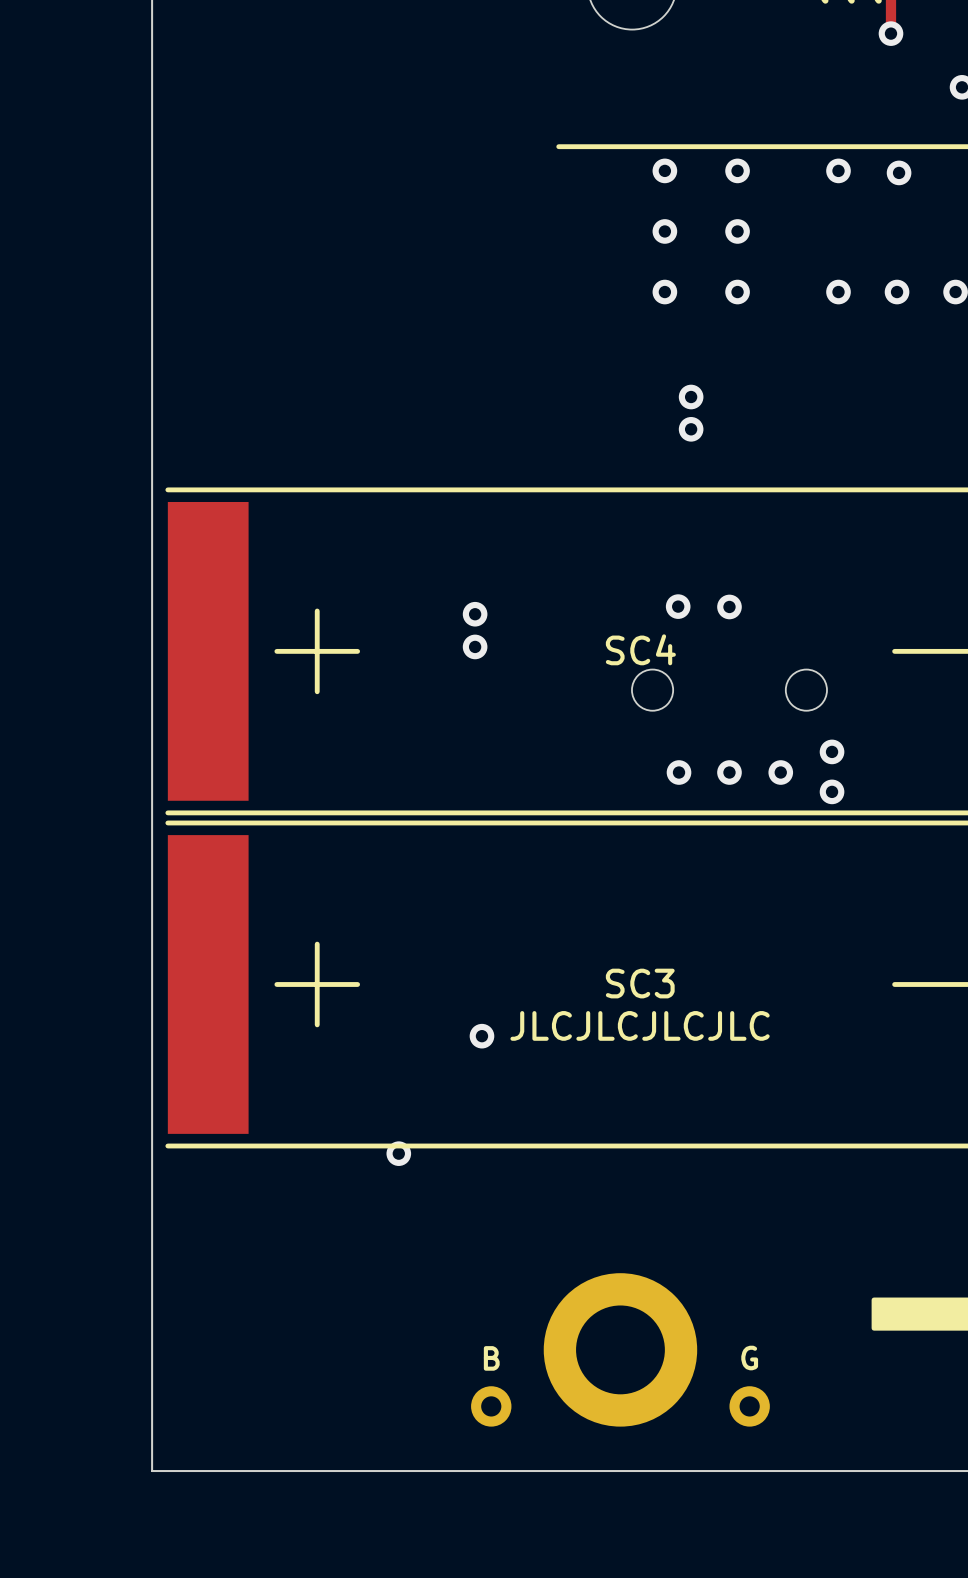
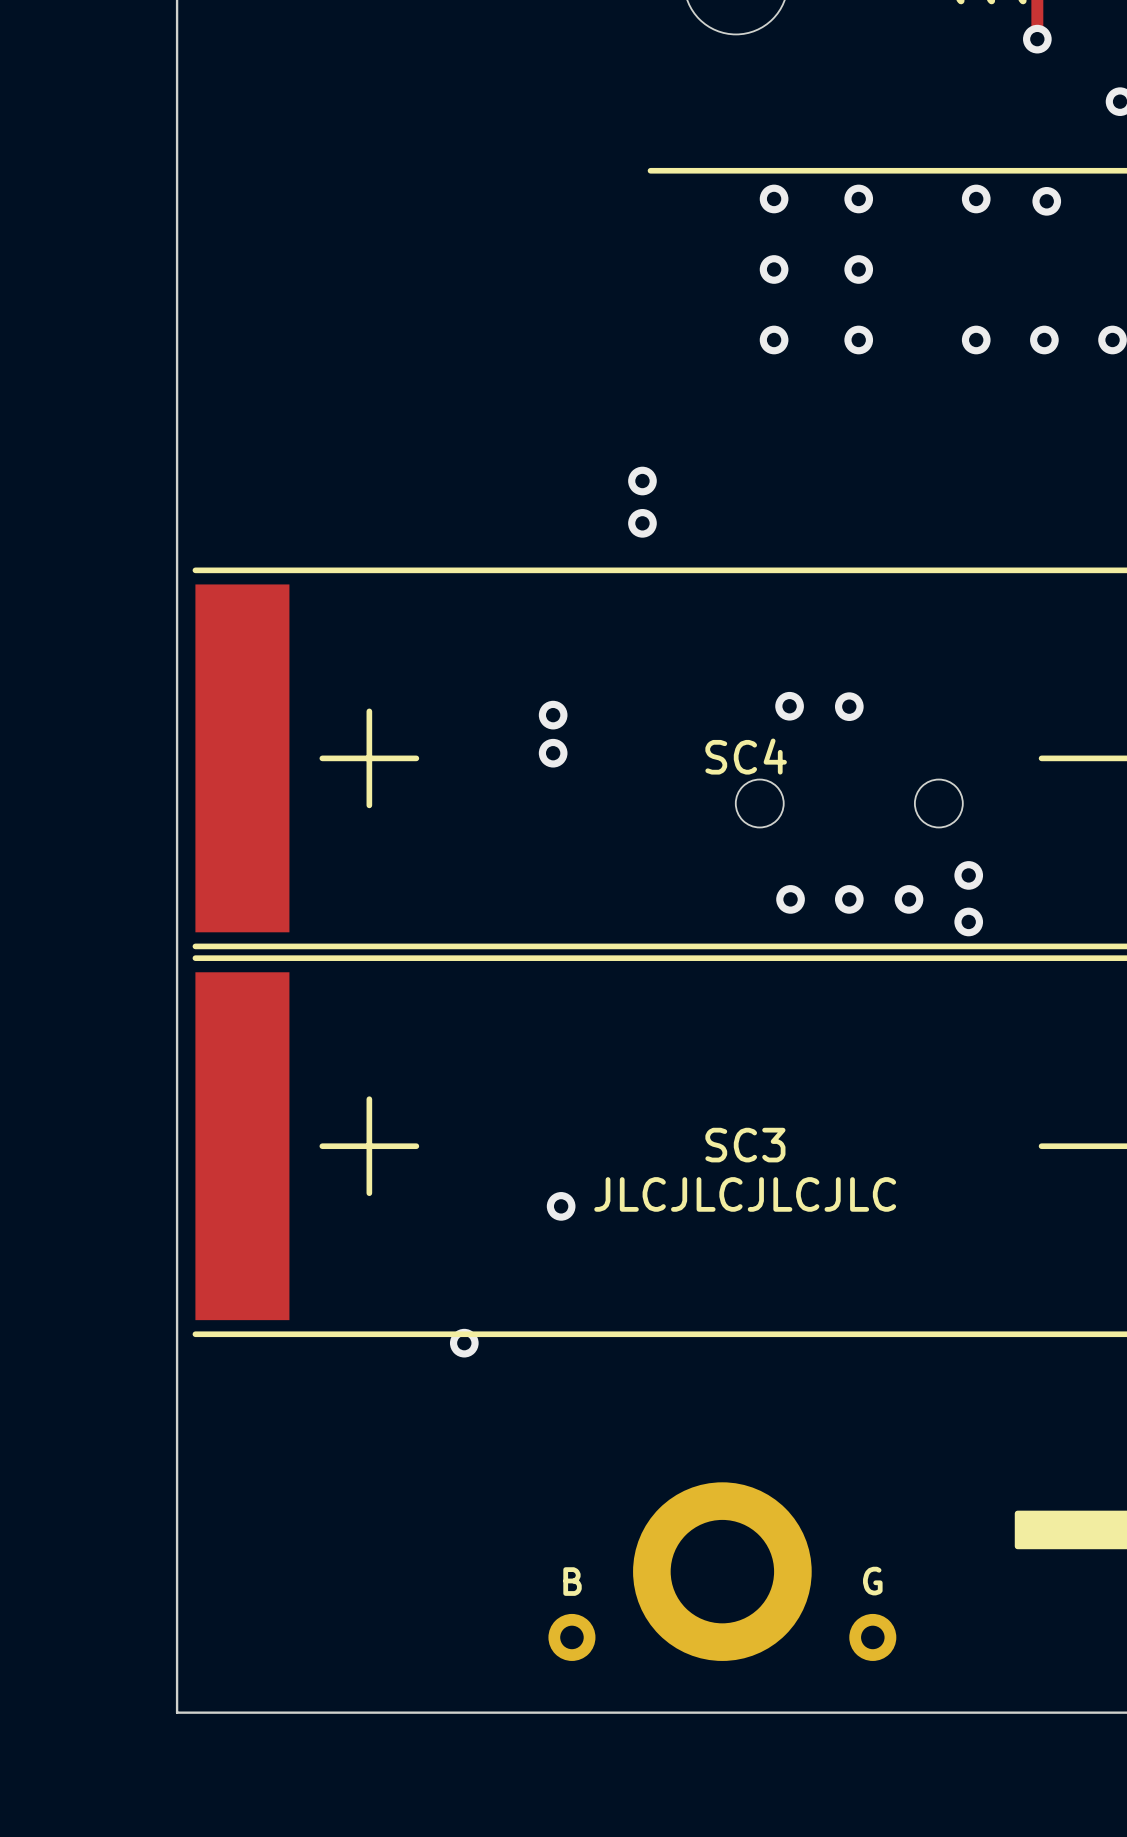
via: (691, 397) -> none
via: none -> (642, 481)
via: (691, 429) -> none
via: none -> (642, 523)

